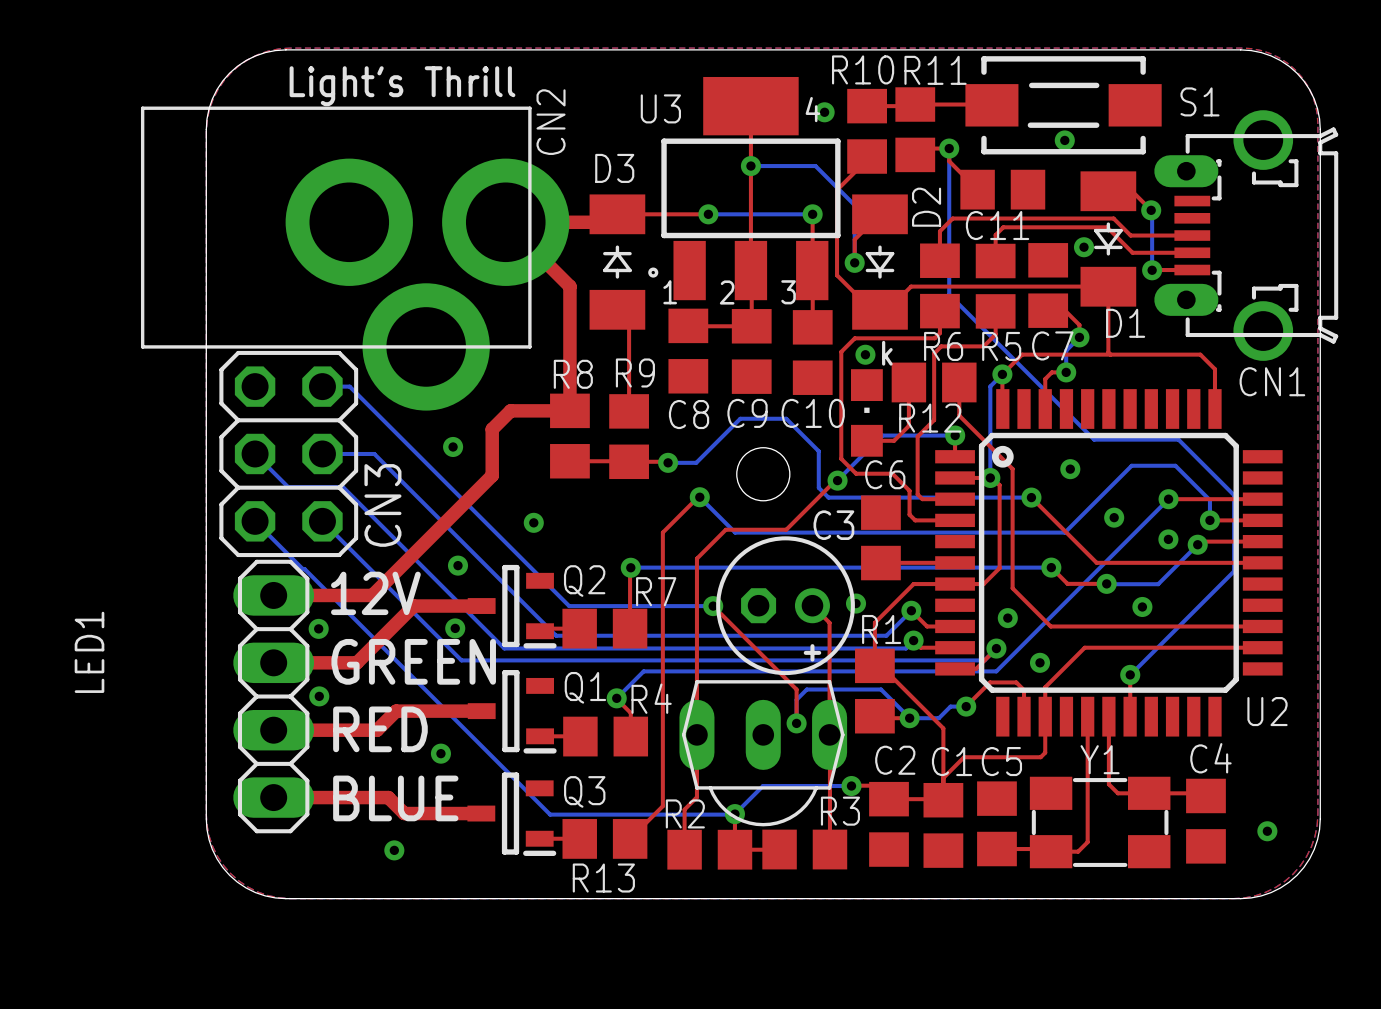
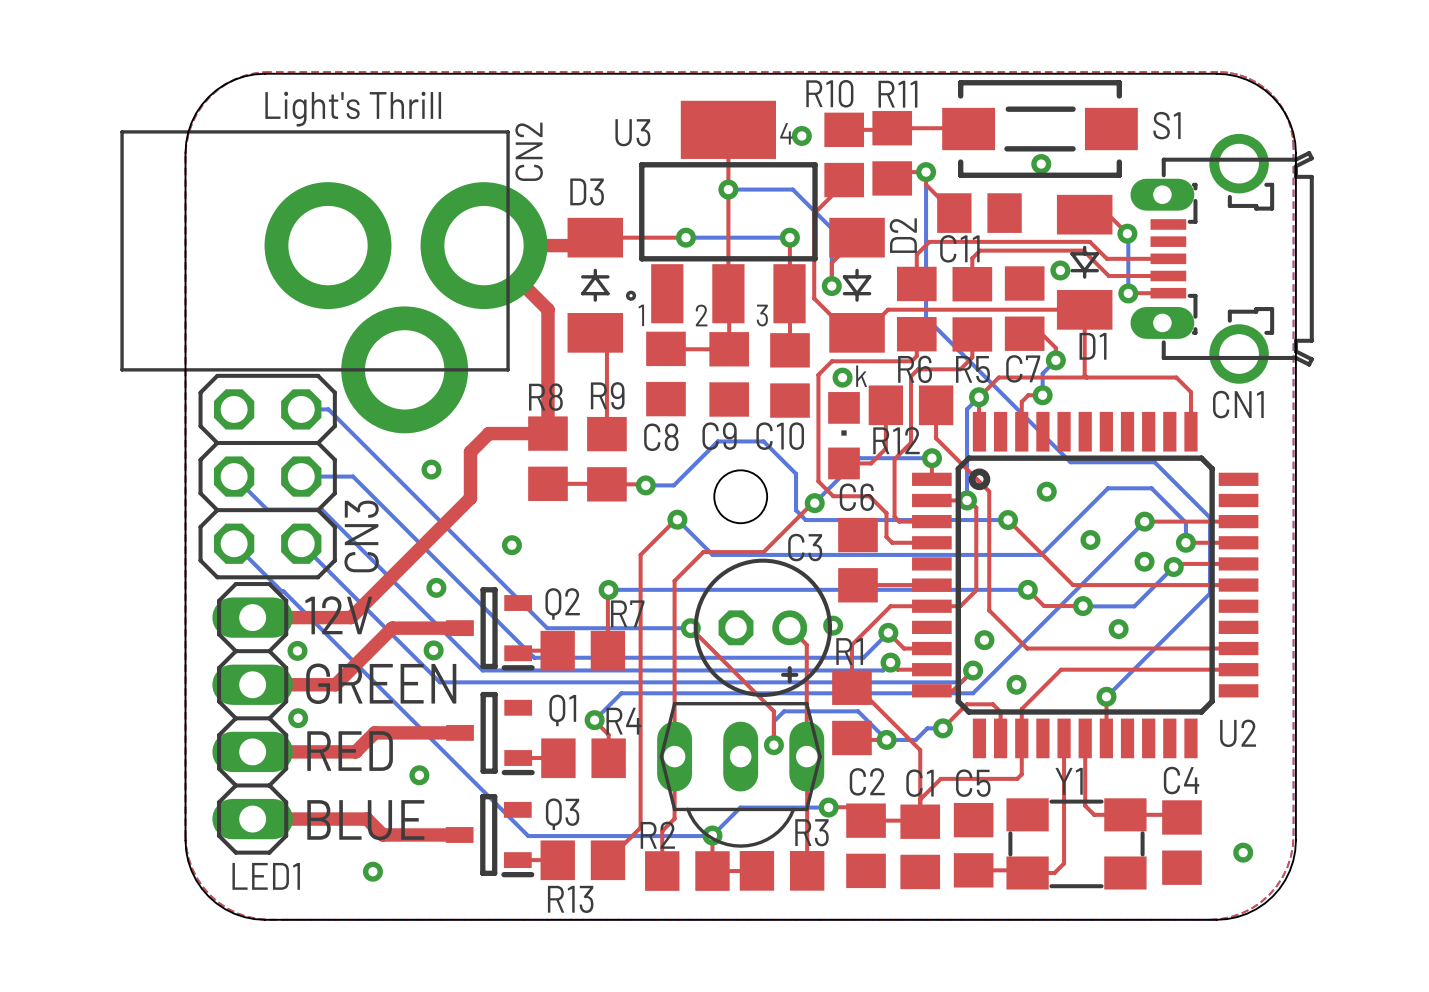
LED1 name rotation: 0° (89, 652) -> 90° clockwise (266, 876)
LED1 name position: LED1 (89, 652) -> LED1 (266, 876)

